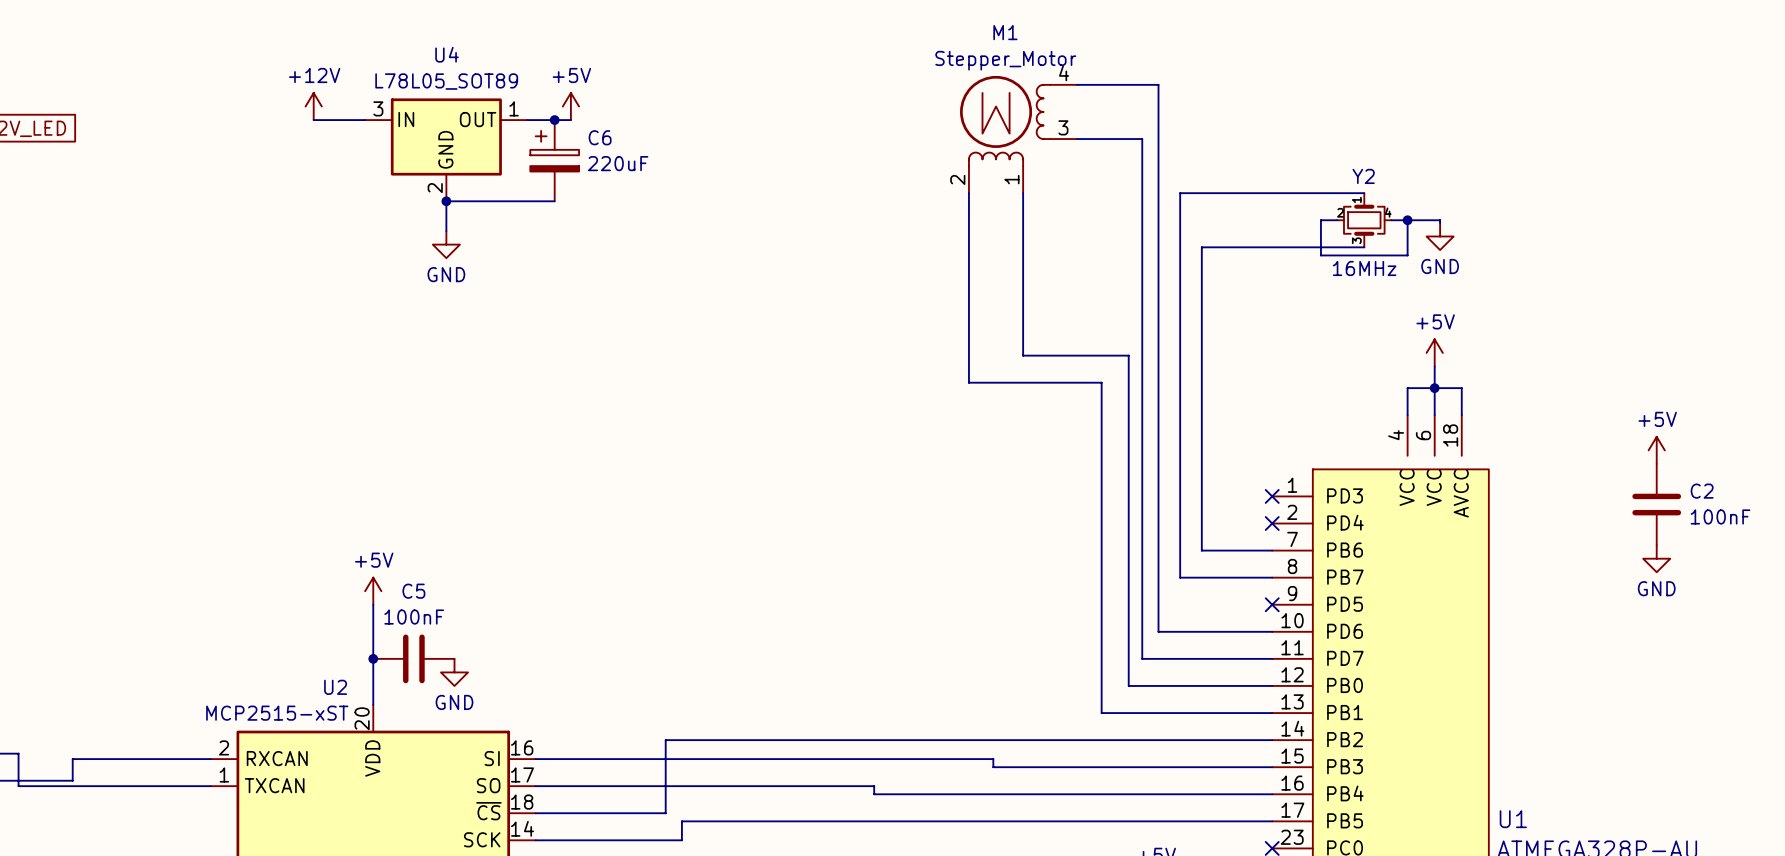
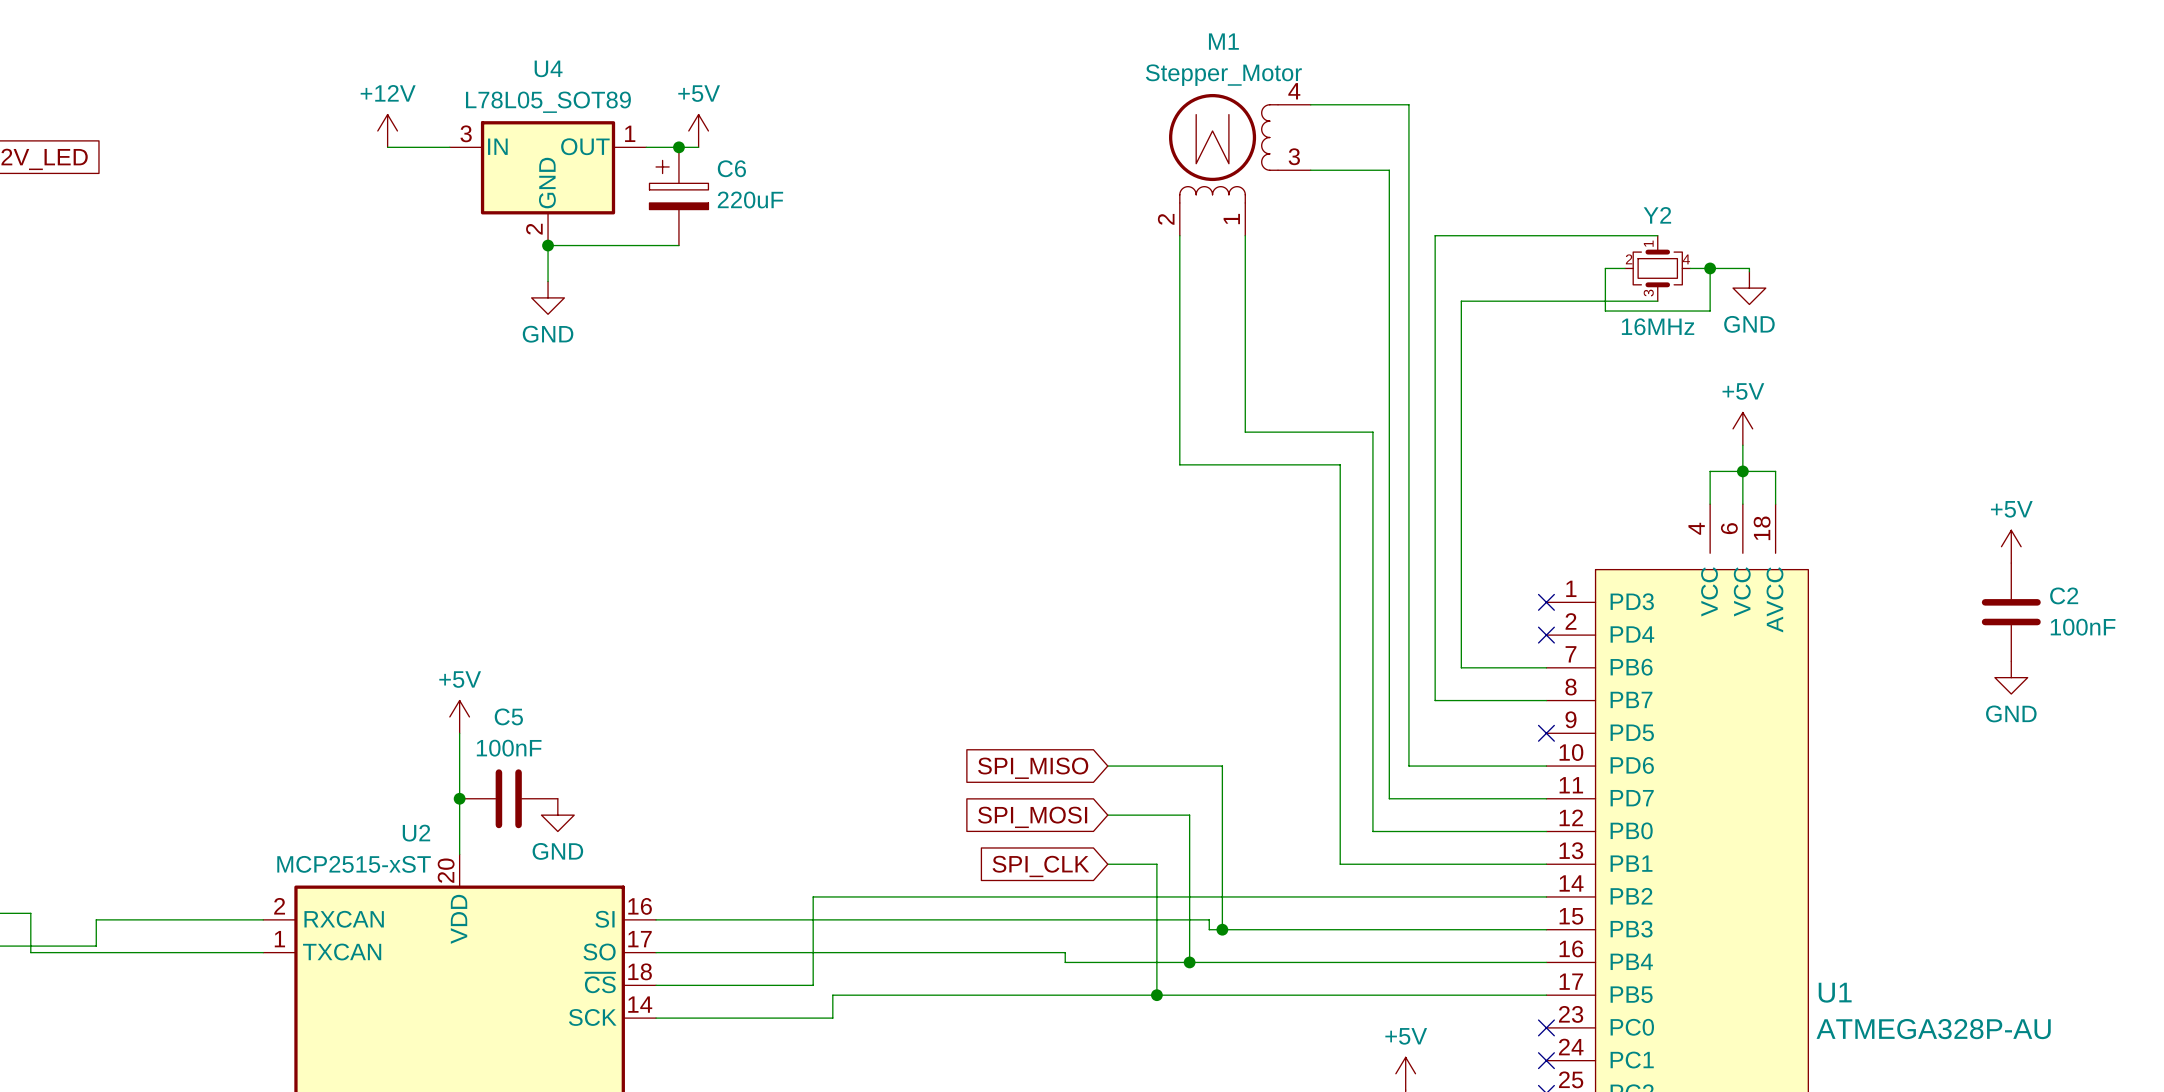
wire: none -> (1107, 766) (1222, 766) (1222, 929)
global label: none -> SPI_MISO (1033, 768)
wire: none -> (1107, 815) (1189, 815) (1189, 962)
global label: none -> SPI_MOSI (1032, 817)
global label: none -> SPI_CLK (1040, 866)
wire: none -> (1107, 864) (1156, 864) (1156, 995)
junction: none -> (1222, 929)
junction: none -> (1189, 962)
junction: none -> (1156, 995)

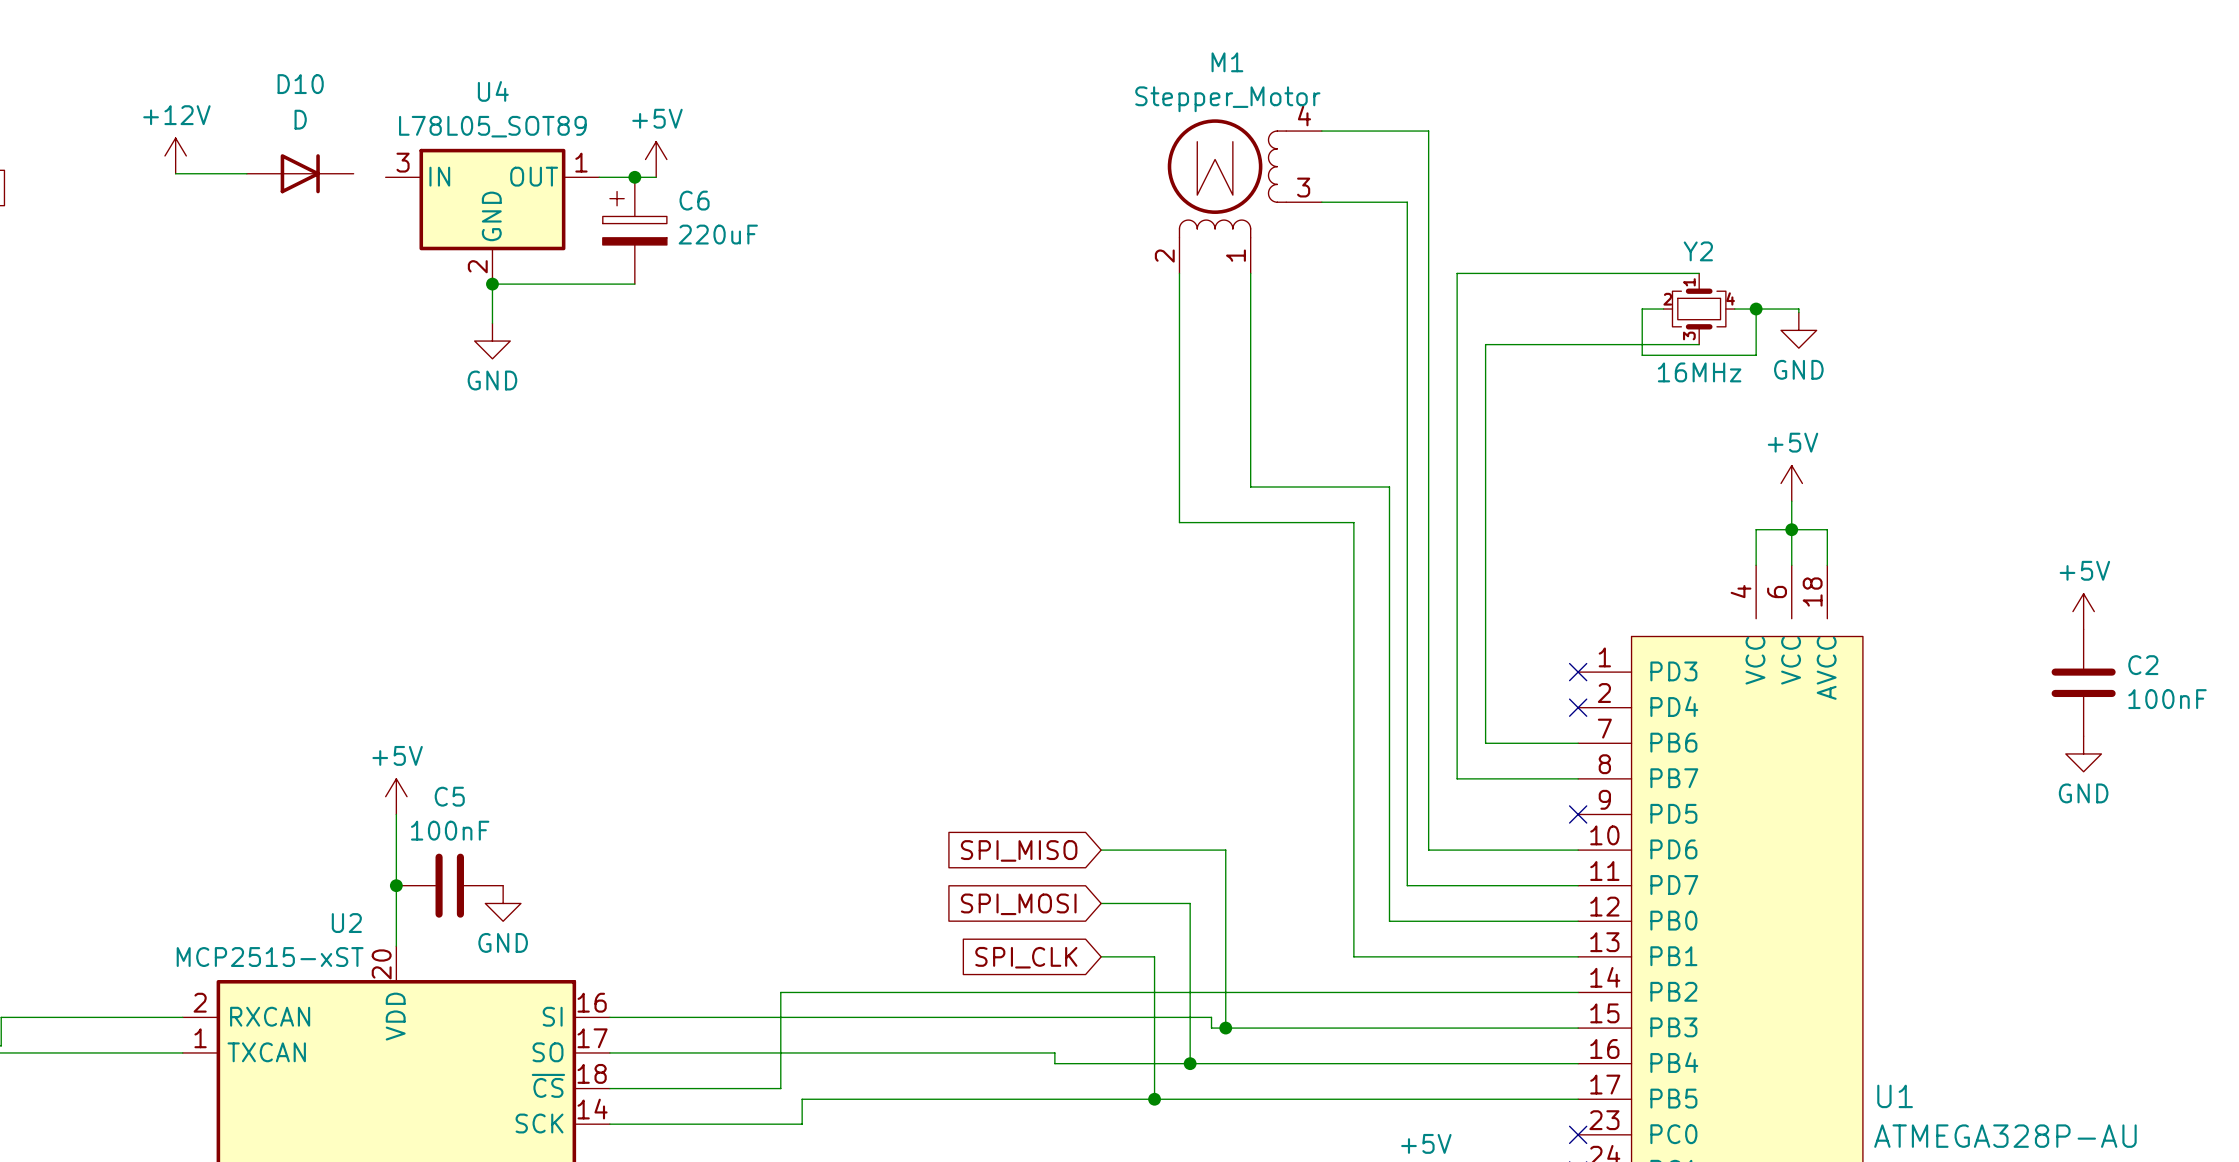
power symbol position: +12V (387, 130) -> +12V (175, 155)
wire: none -> (175, 173) (246, 173)
D10: none -> D (300, 173)
wire: (387, 147) (449, 147) -> none

